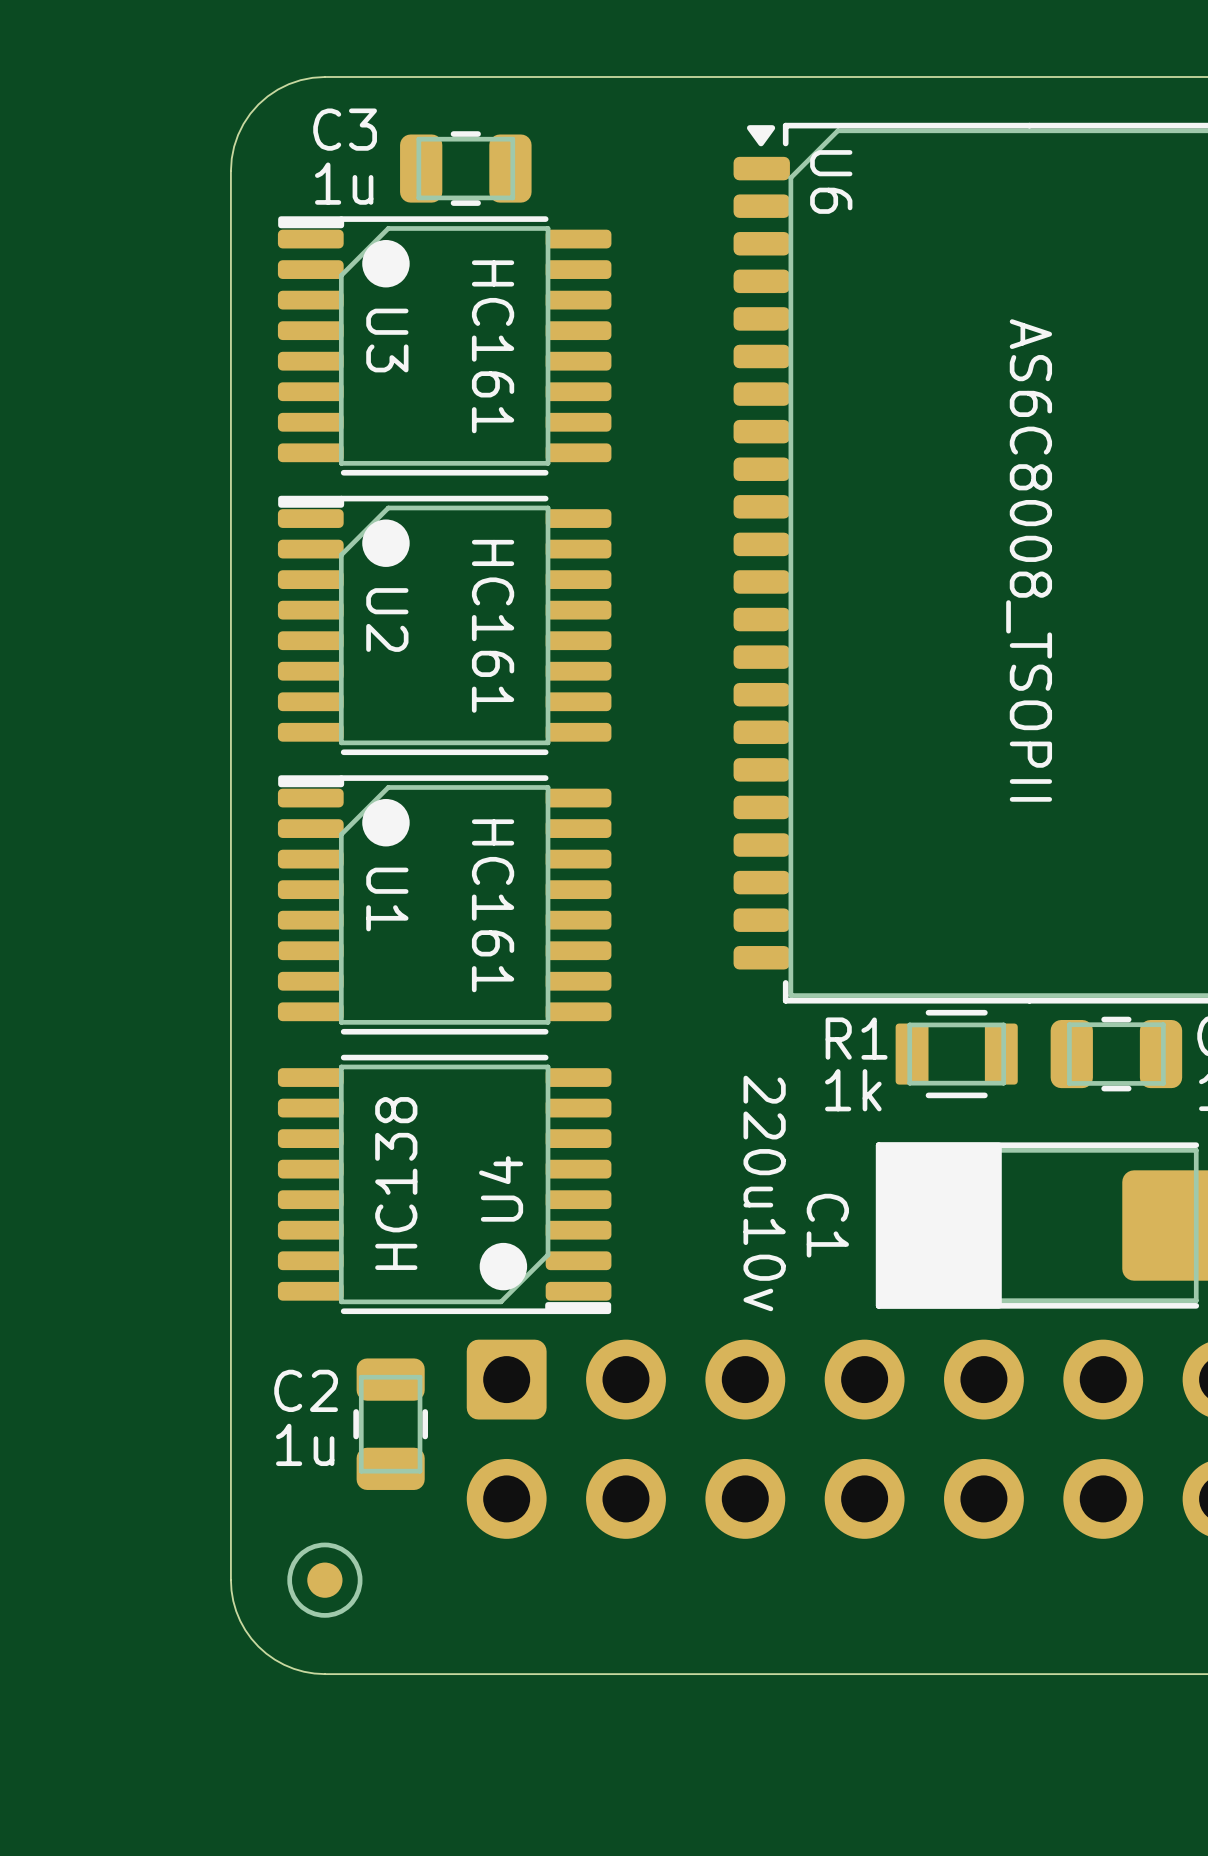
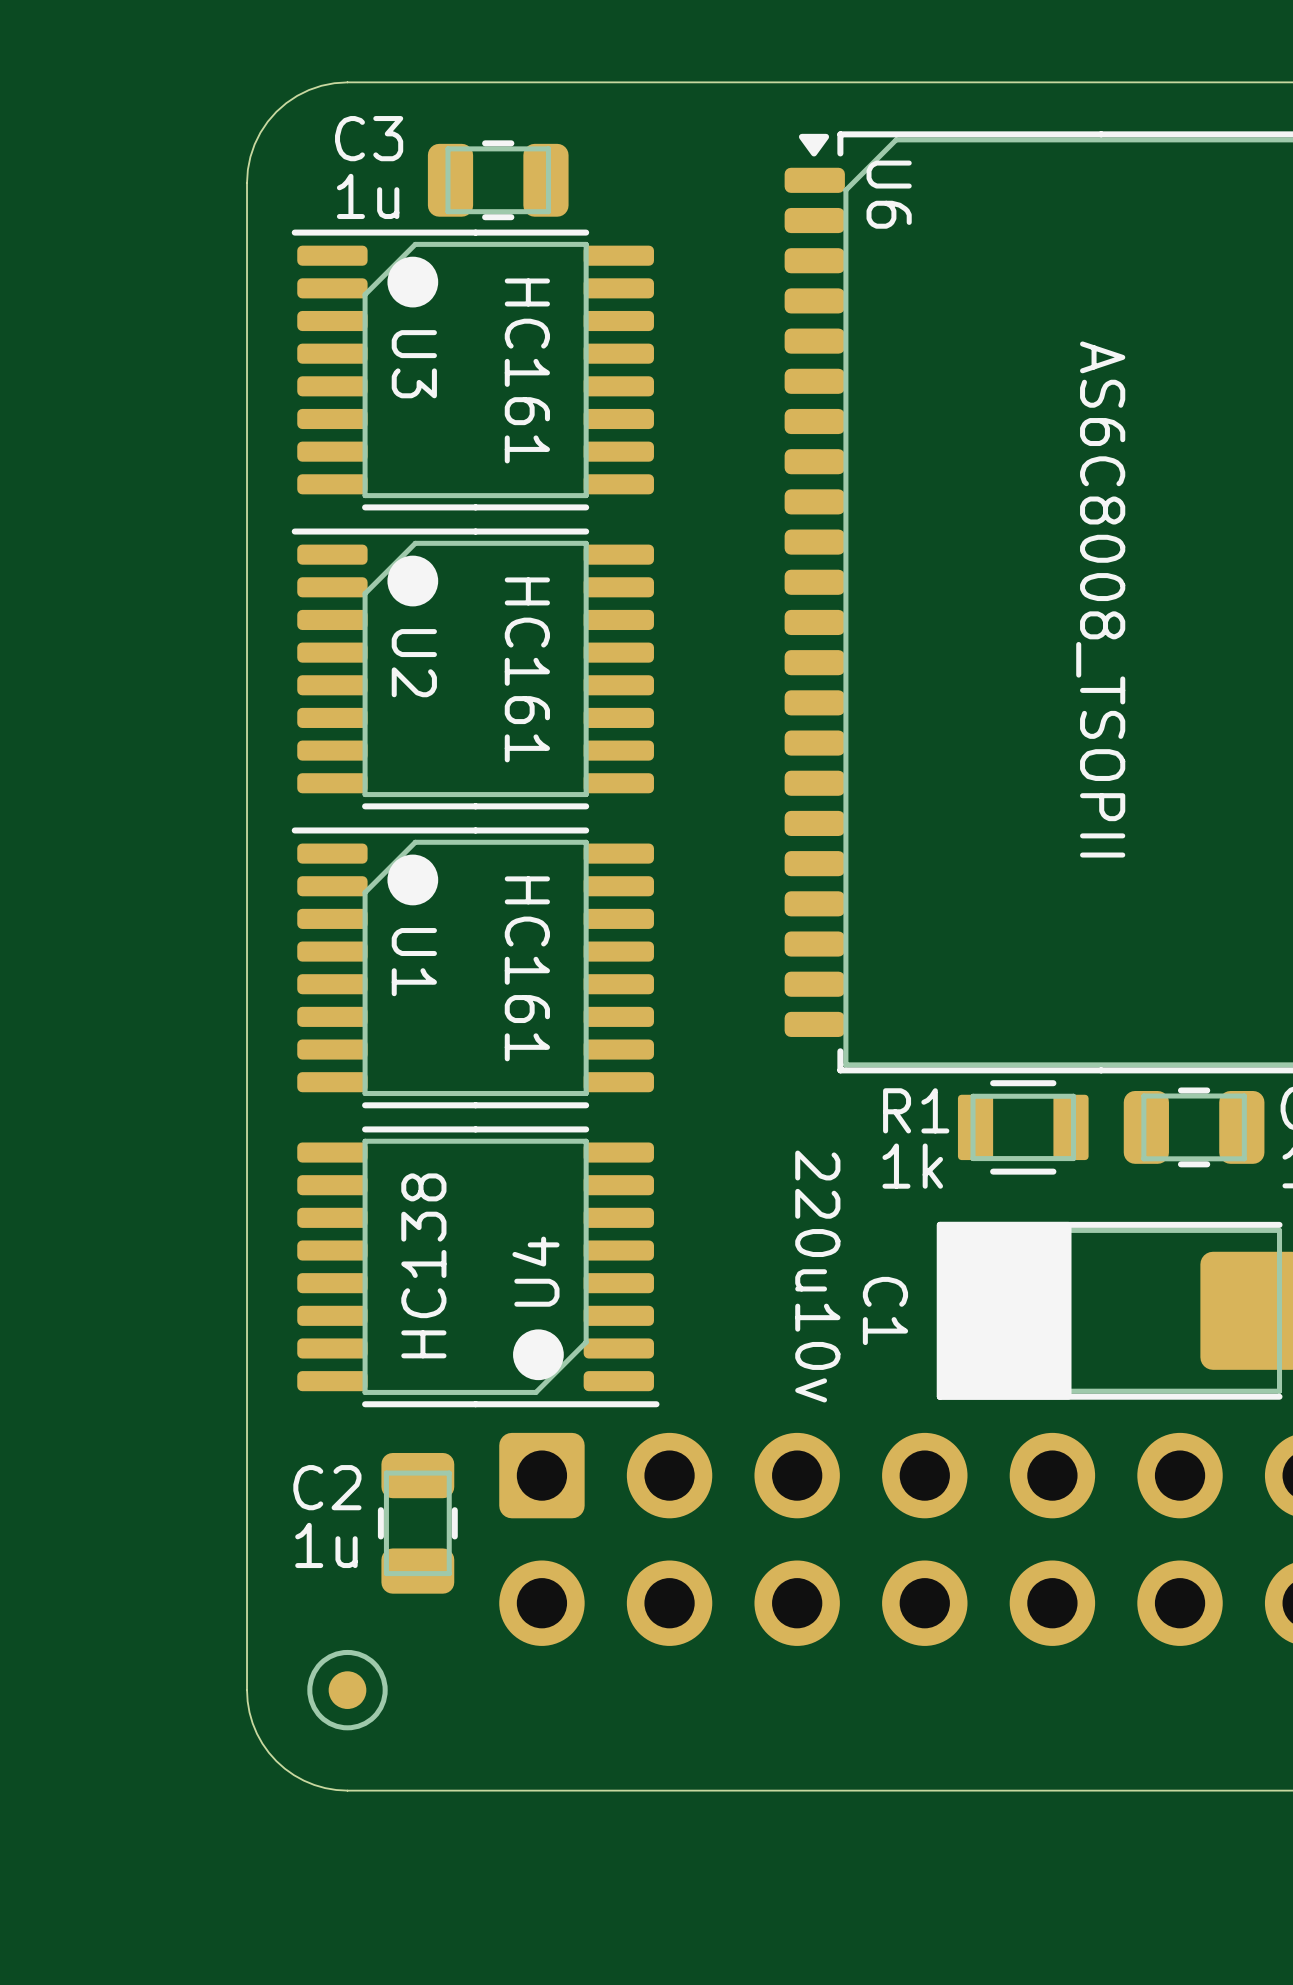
U3 footprint: [277, 216, 612, 476] -> [291, 229, 654, 511]
U2 footprint: [277, 495, 612, 756] -> [291, 528, 654, 810]
U1 footprint: [277, 775, 612, 1035] -> [291, 827, 654, 1109]
U4 footprint: [277, 1054, 612, 1315] -> [297, 1126, 660, 1408]

